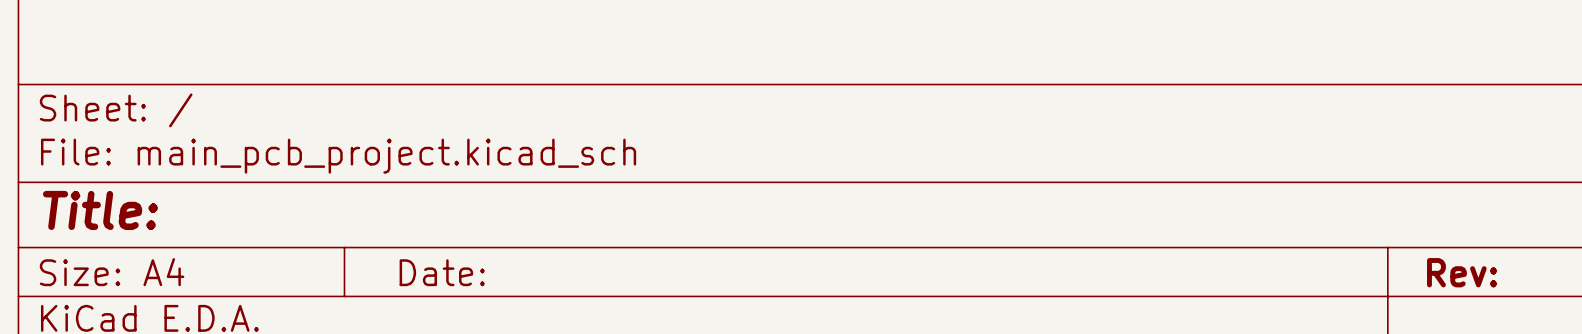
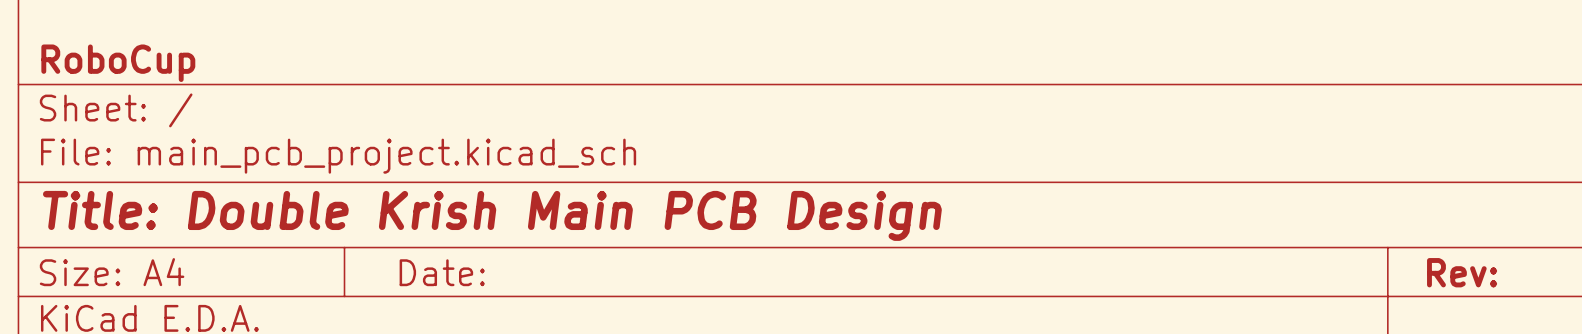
title block: none -> RoboCup (118, 63)
title block: Title: (100, 210) -> Title: Double Krish Main PCB Design (492, 215)

